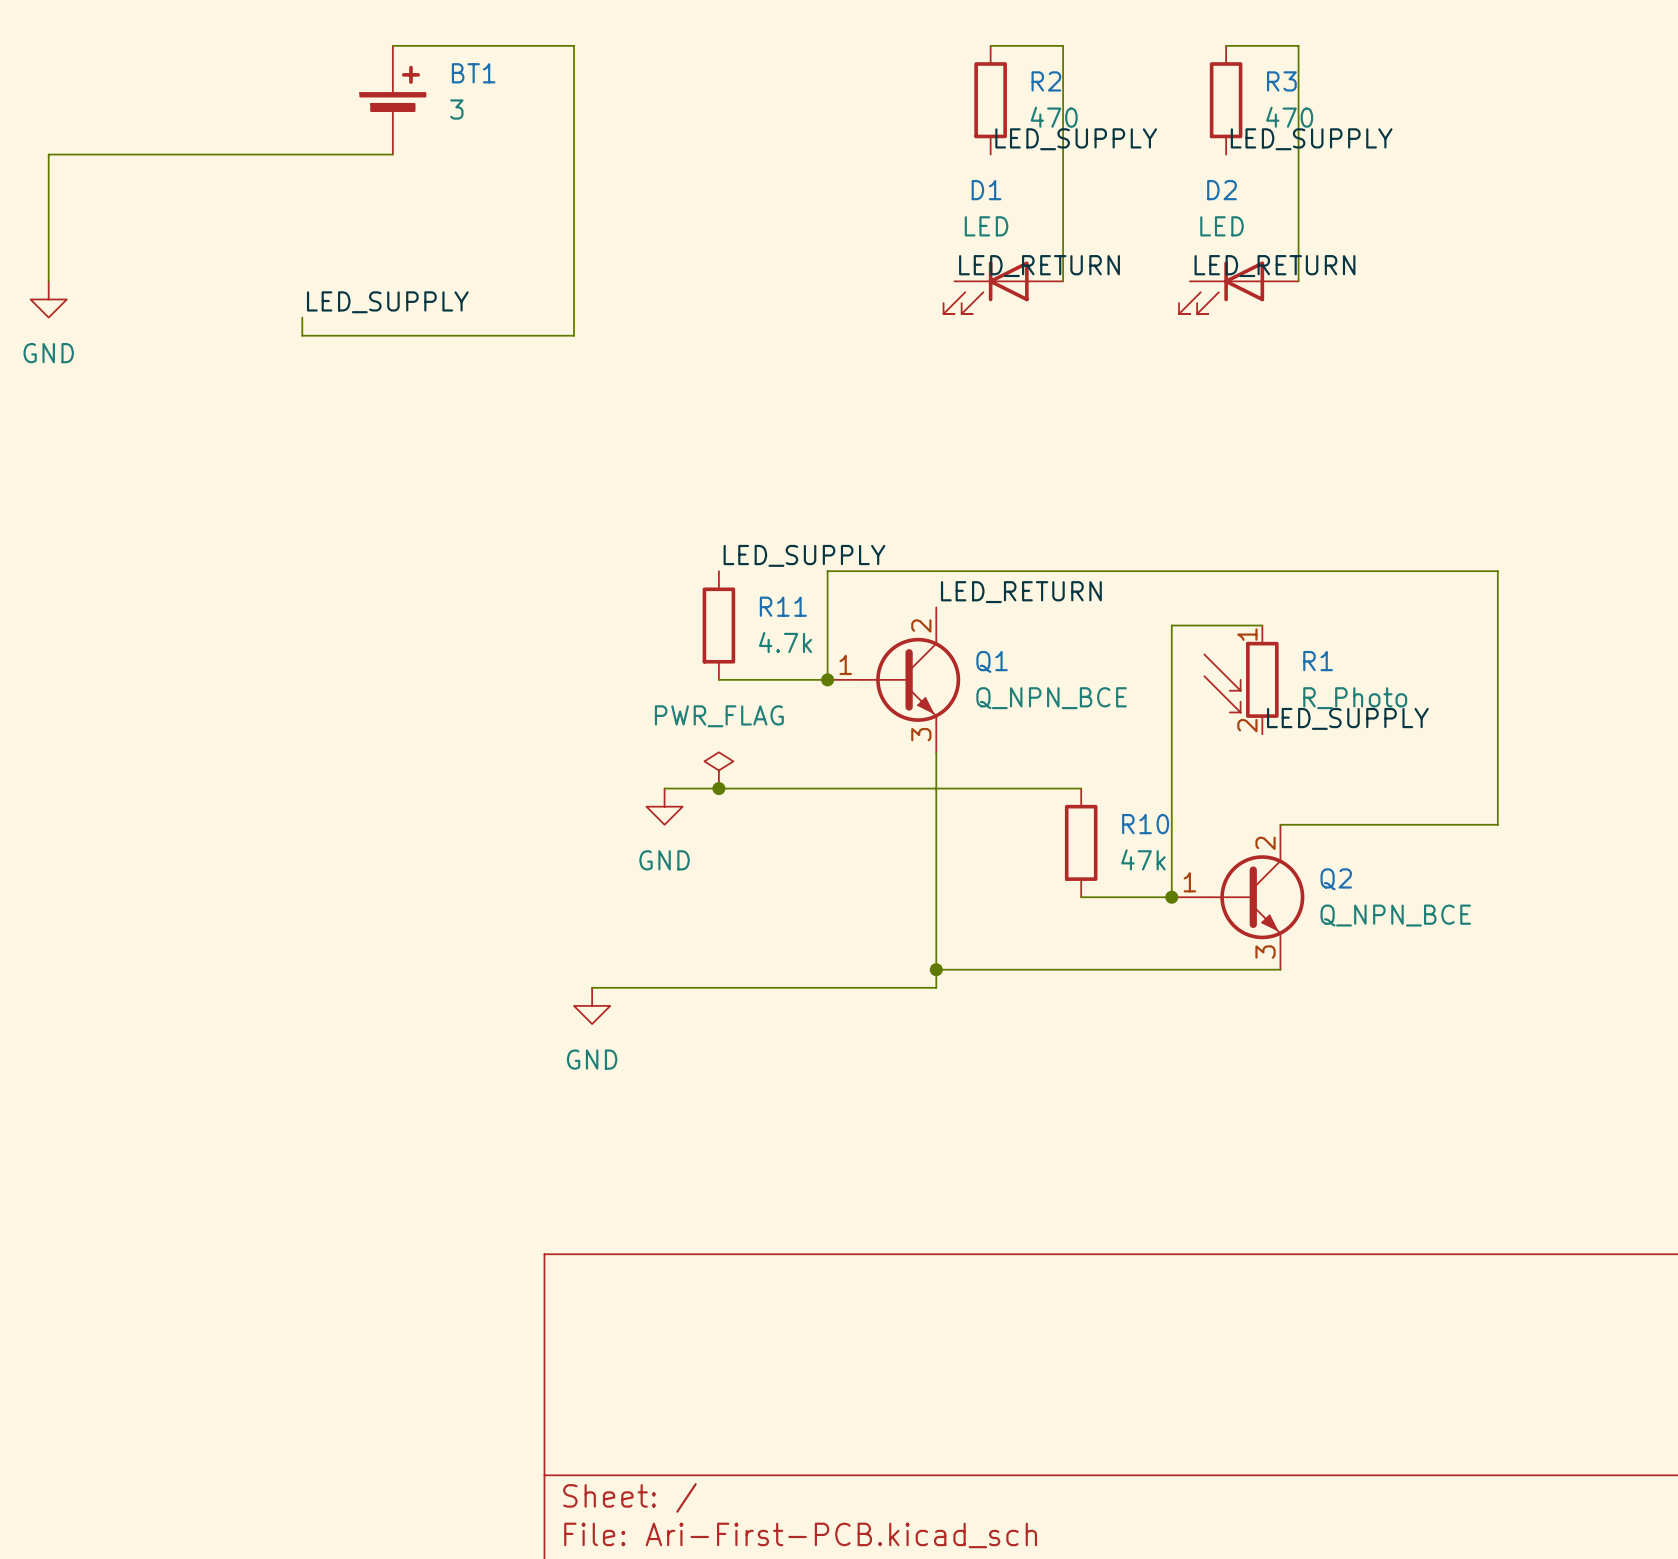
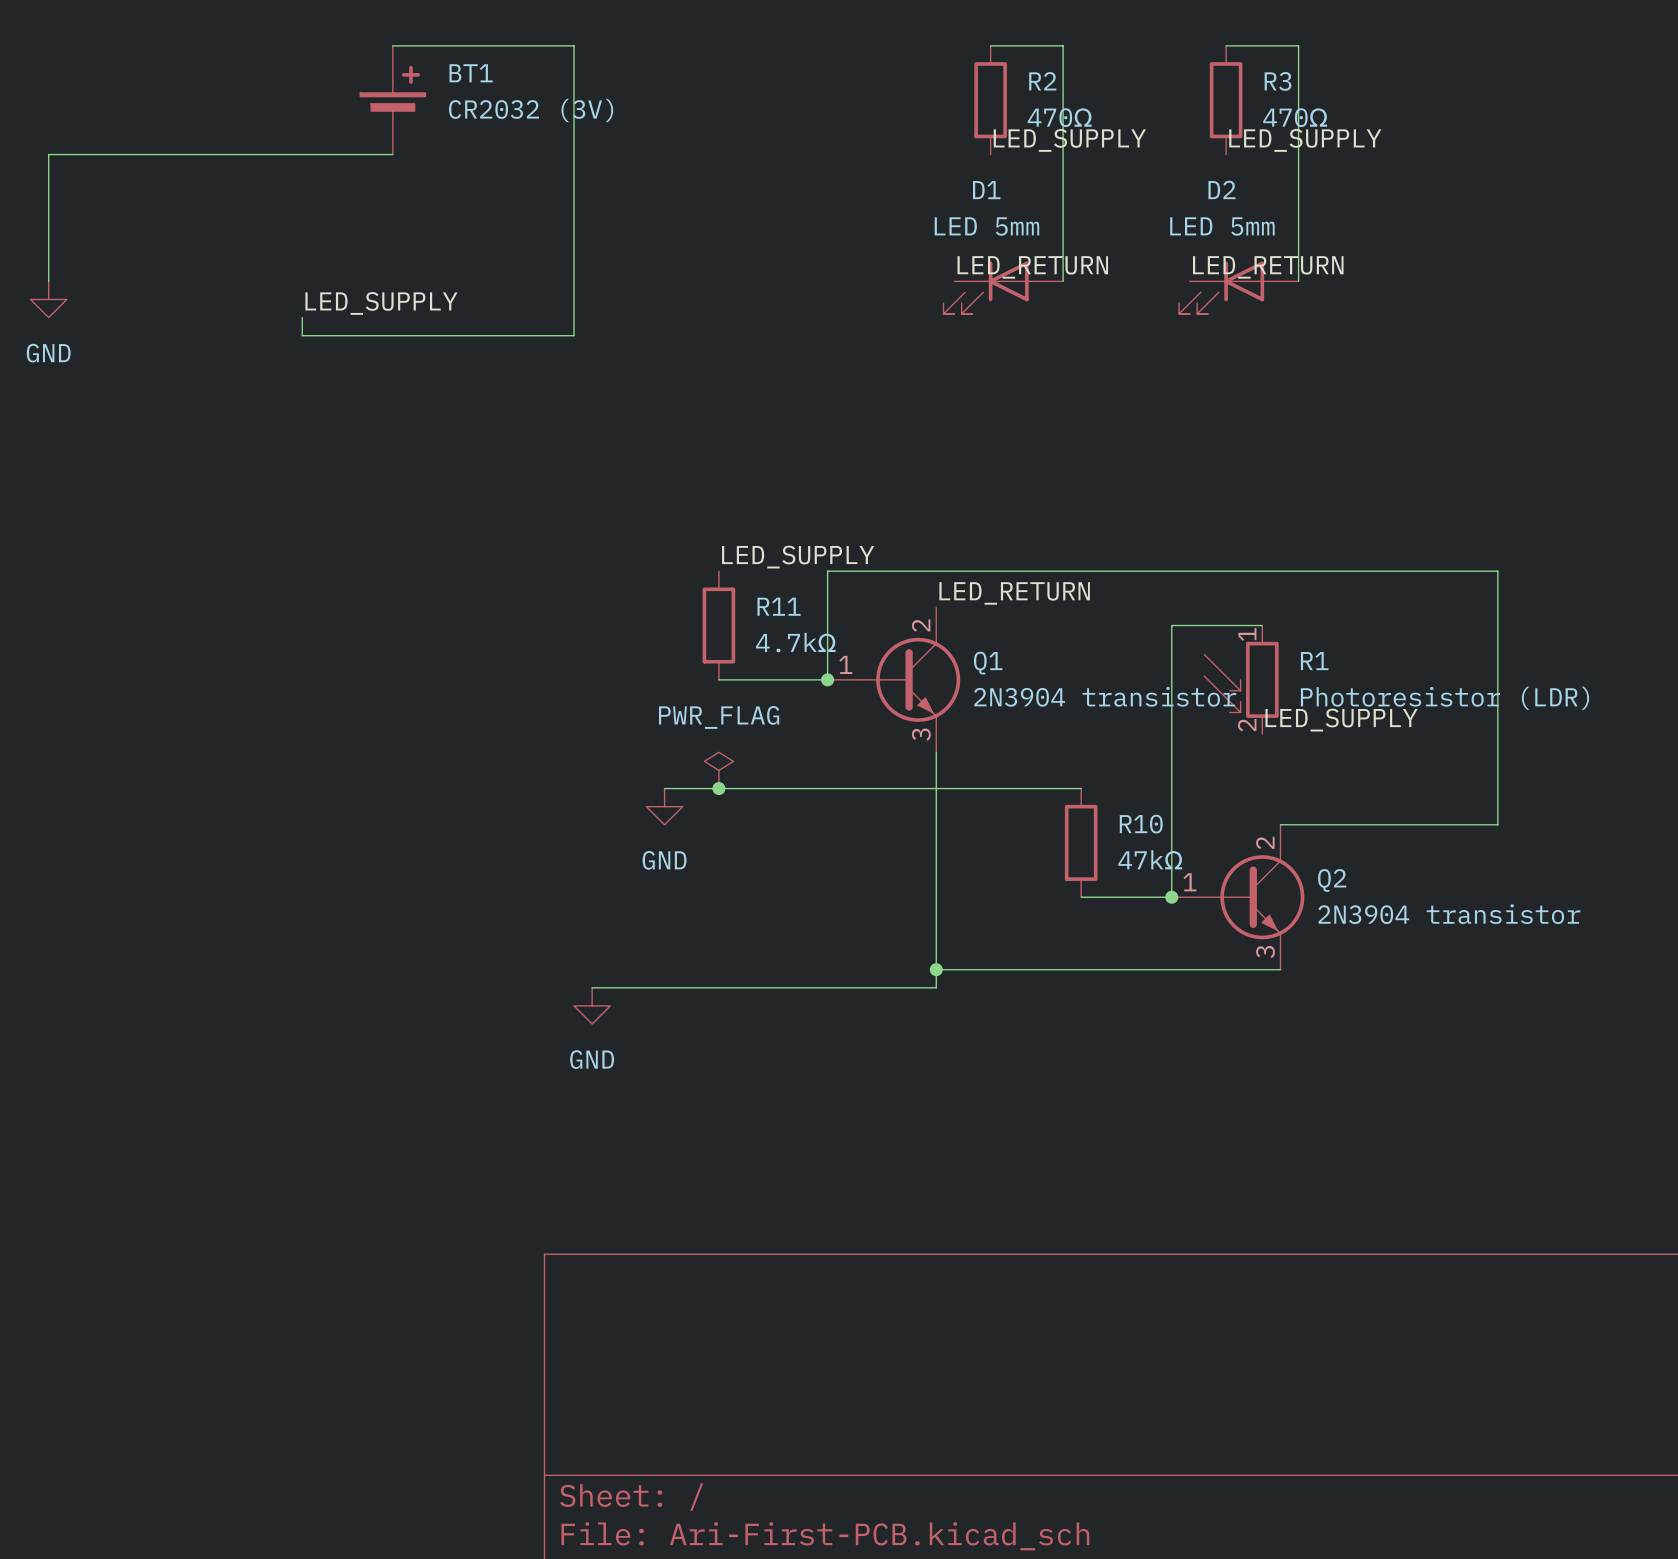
BT1 value: 3 (456, 109) -> CR2032 (3V) (531, 110)
R2 value: 470 (1054, 117) -> 470Ω (1059, 117)
R3 value: 470 (1289, 117) -> 470Ω (1295, 117)
D1 value: LED (986, 226) -> LED 5mm (986, 226)
D2 value: LED (1222, 226) -> LED 5mm (1222, 226)
R11 value: 4.7k (785, 642) -> 4.7kΩ (795, 642)
Q1 value: Q_NPN_BCE (1051, 698) -> 2N3904 transistor (1105, 696)
R1 value: R_Photo (1355, 698) -> Photoresistor (LDR) (1445, 698)
R10 value: 47k (1143, 859) -> 47kΩ (1150, 859)
Q2 value: Q_NPN_BCE (1395, 915) -> 2N3904 transistor (1449, 914)

